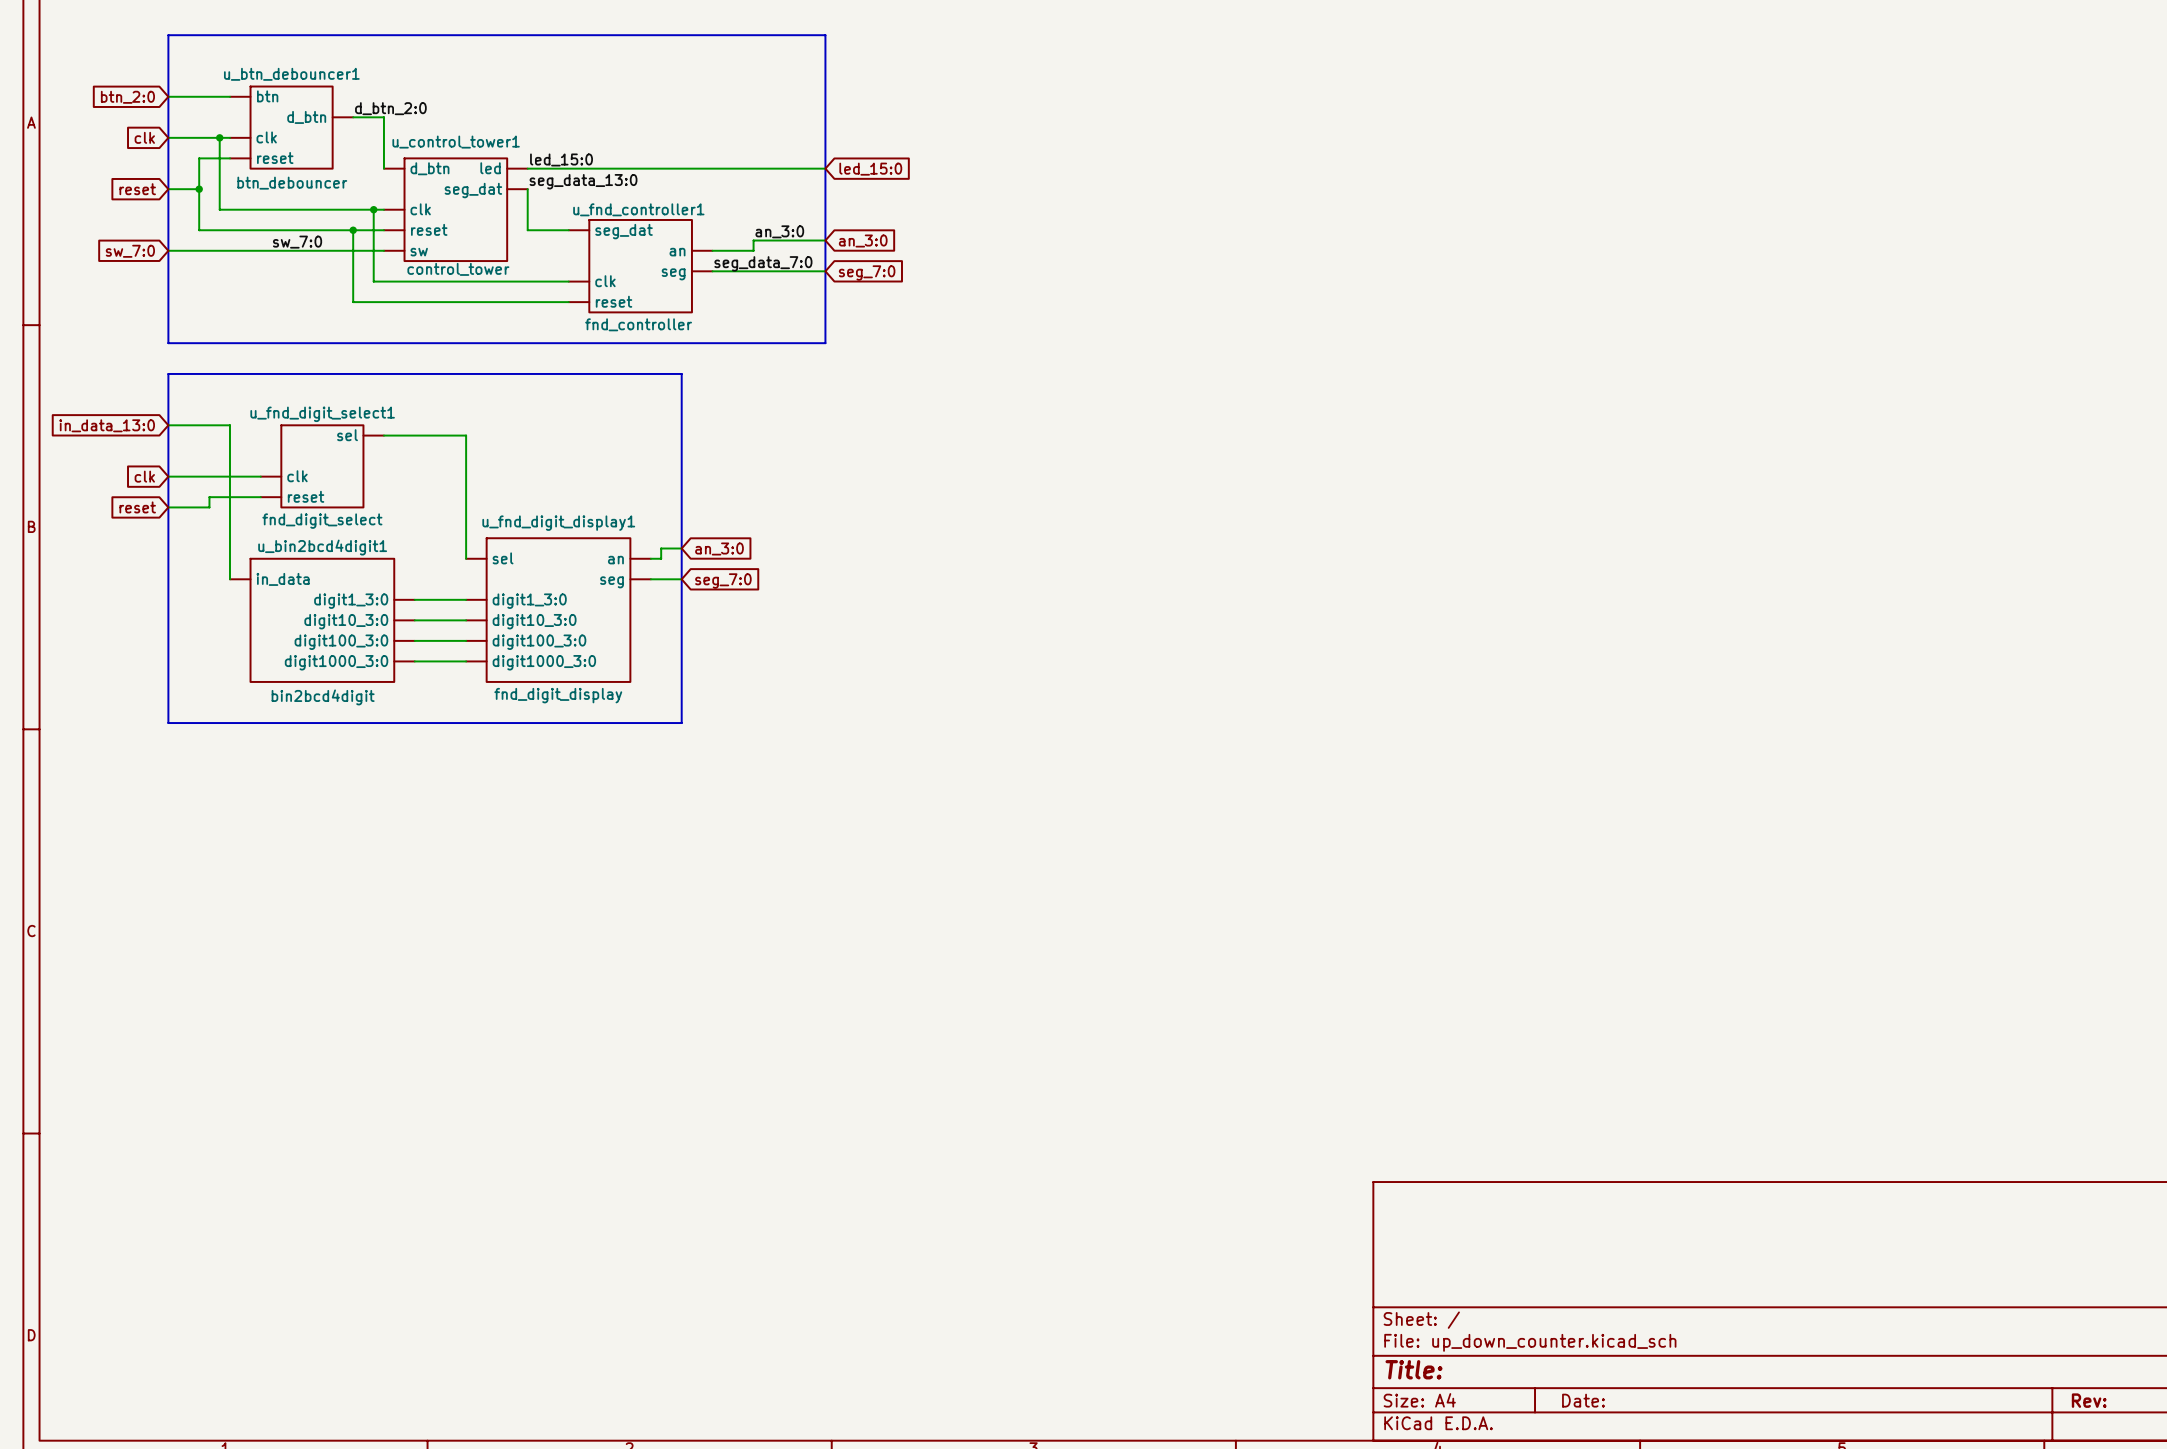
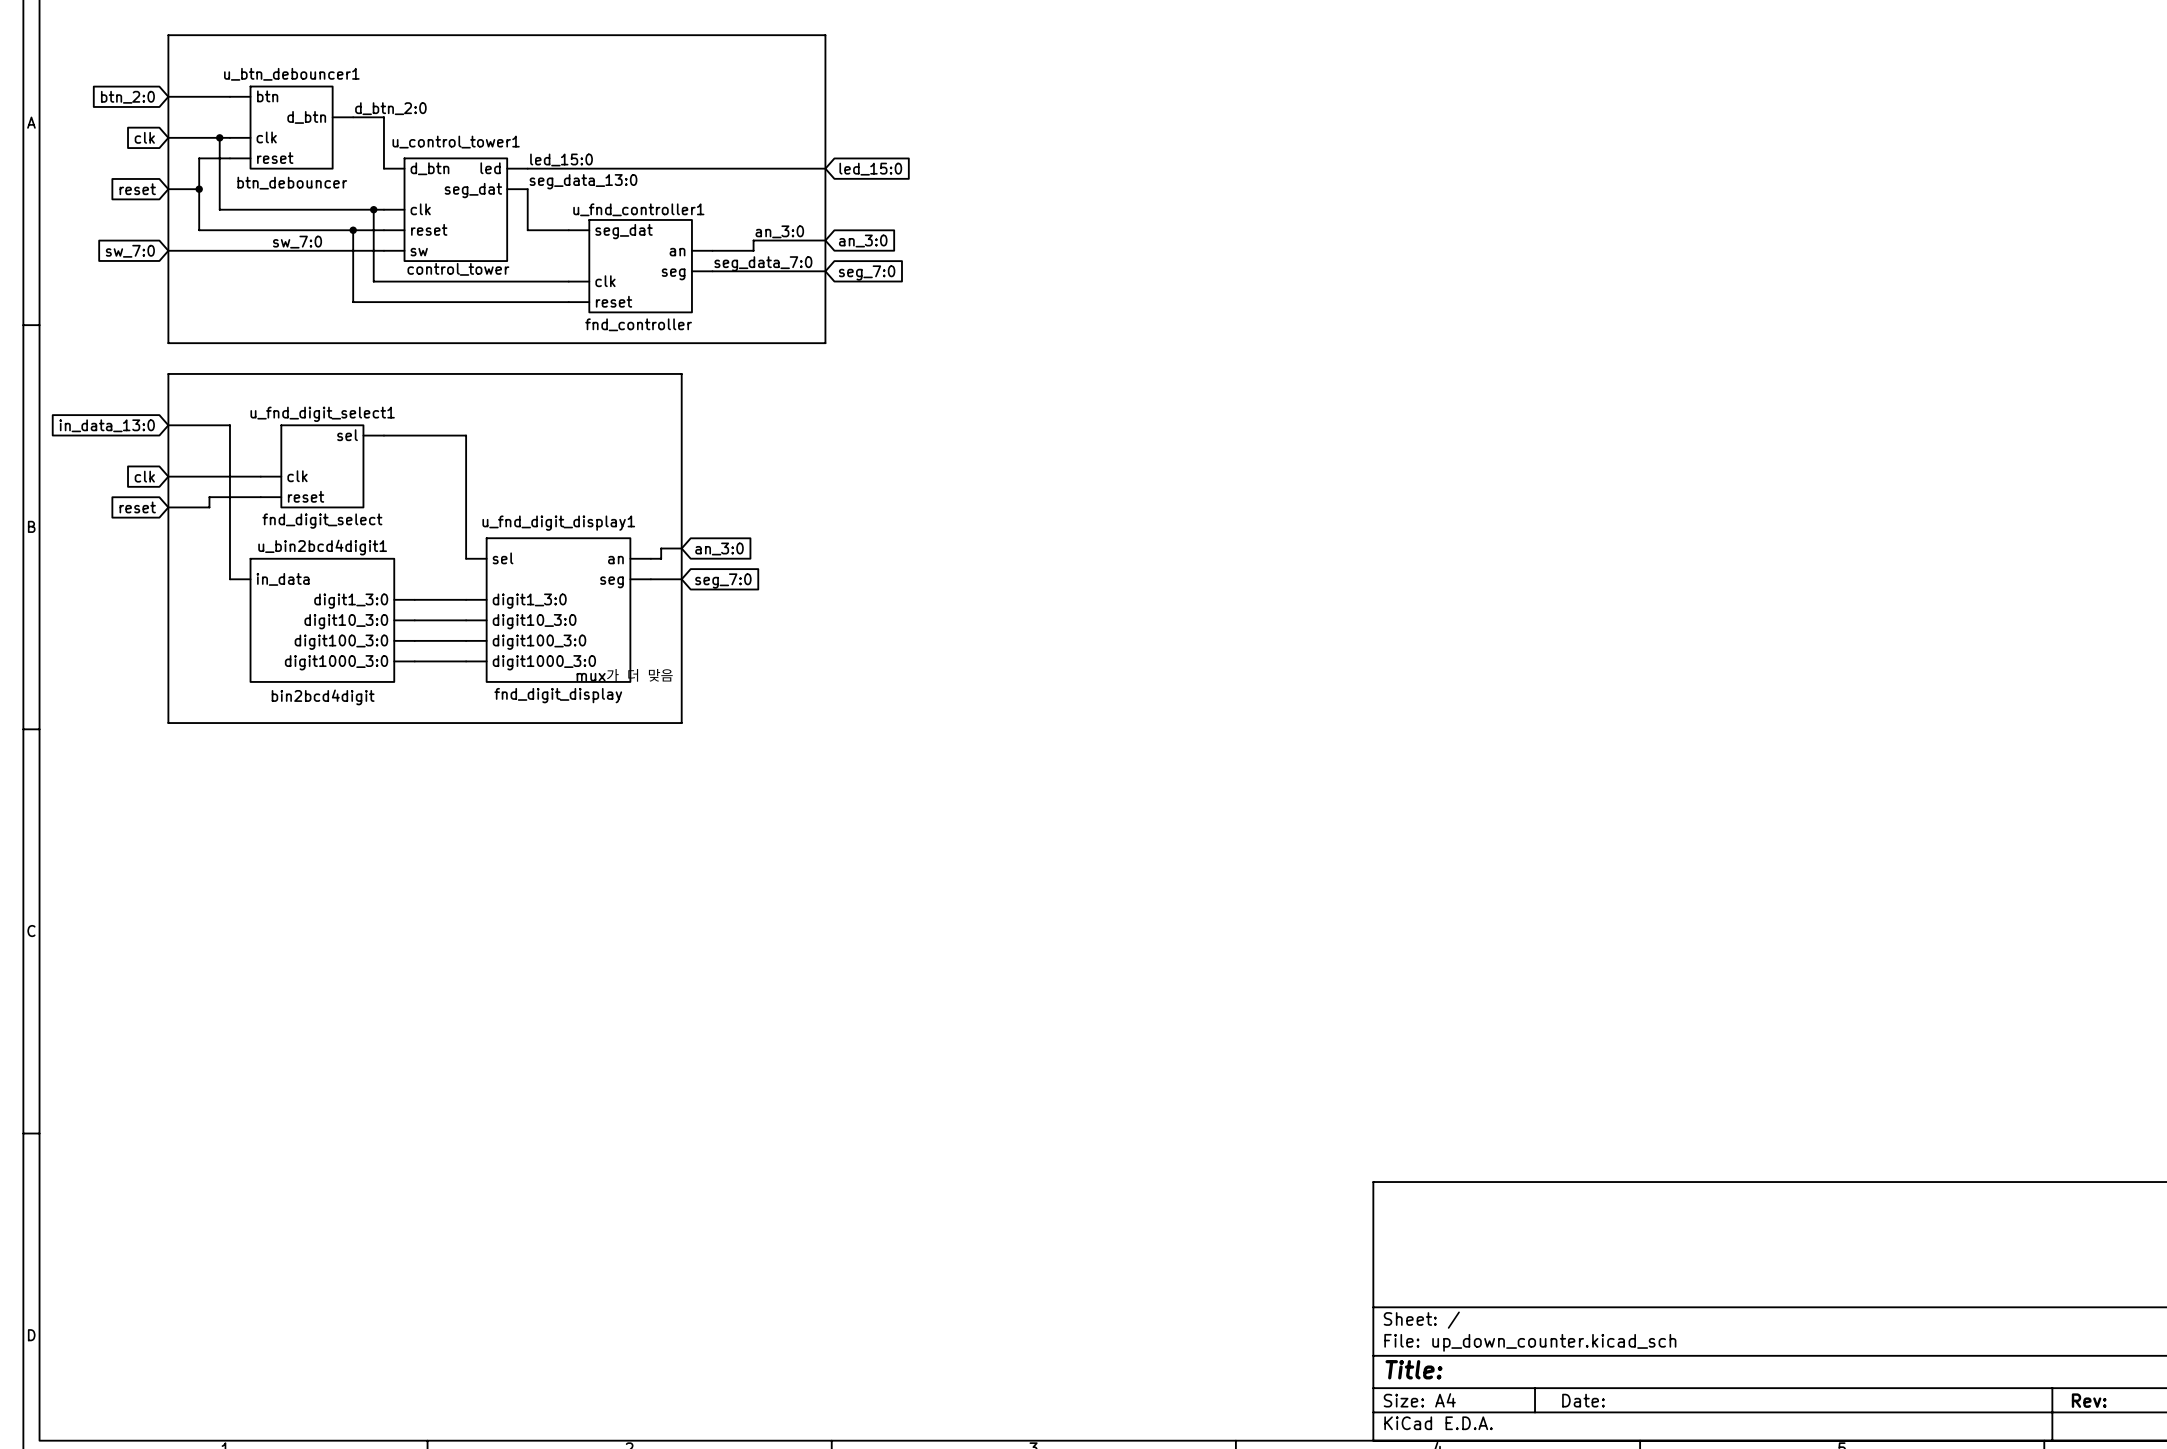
text: none -> mux가 더 맞음 (625, 675)

